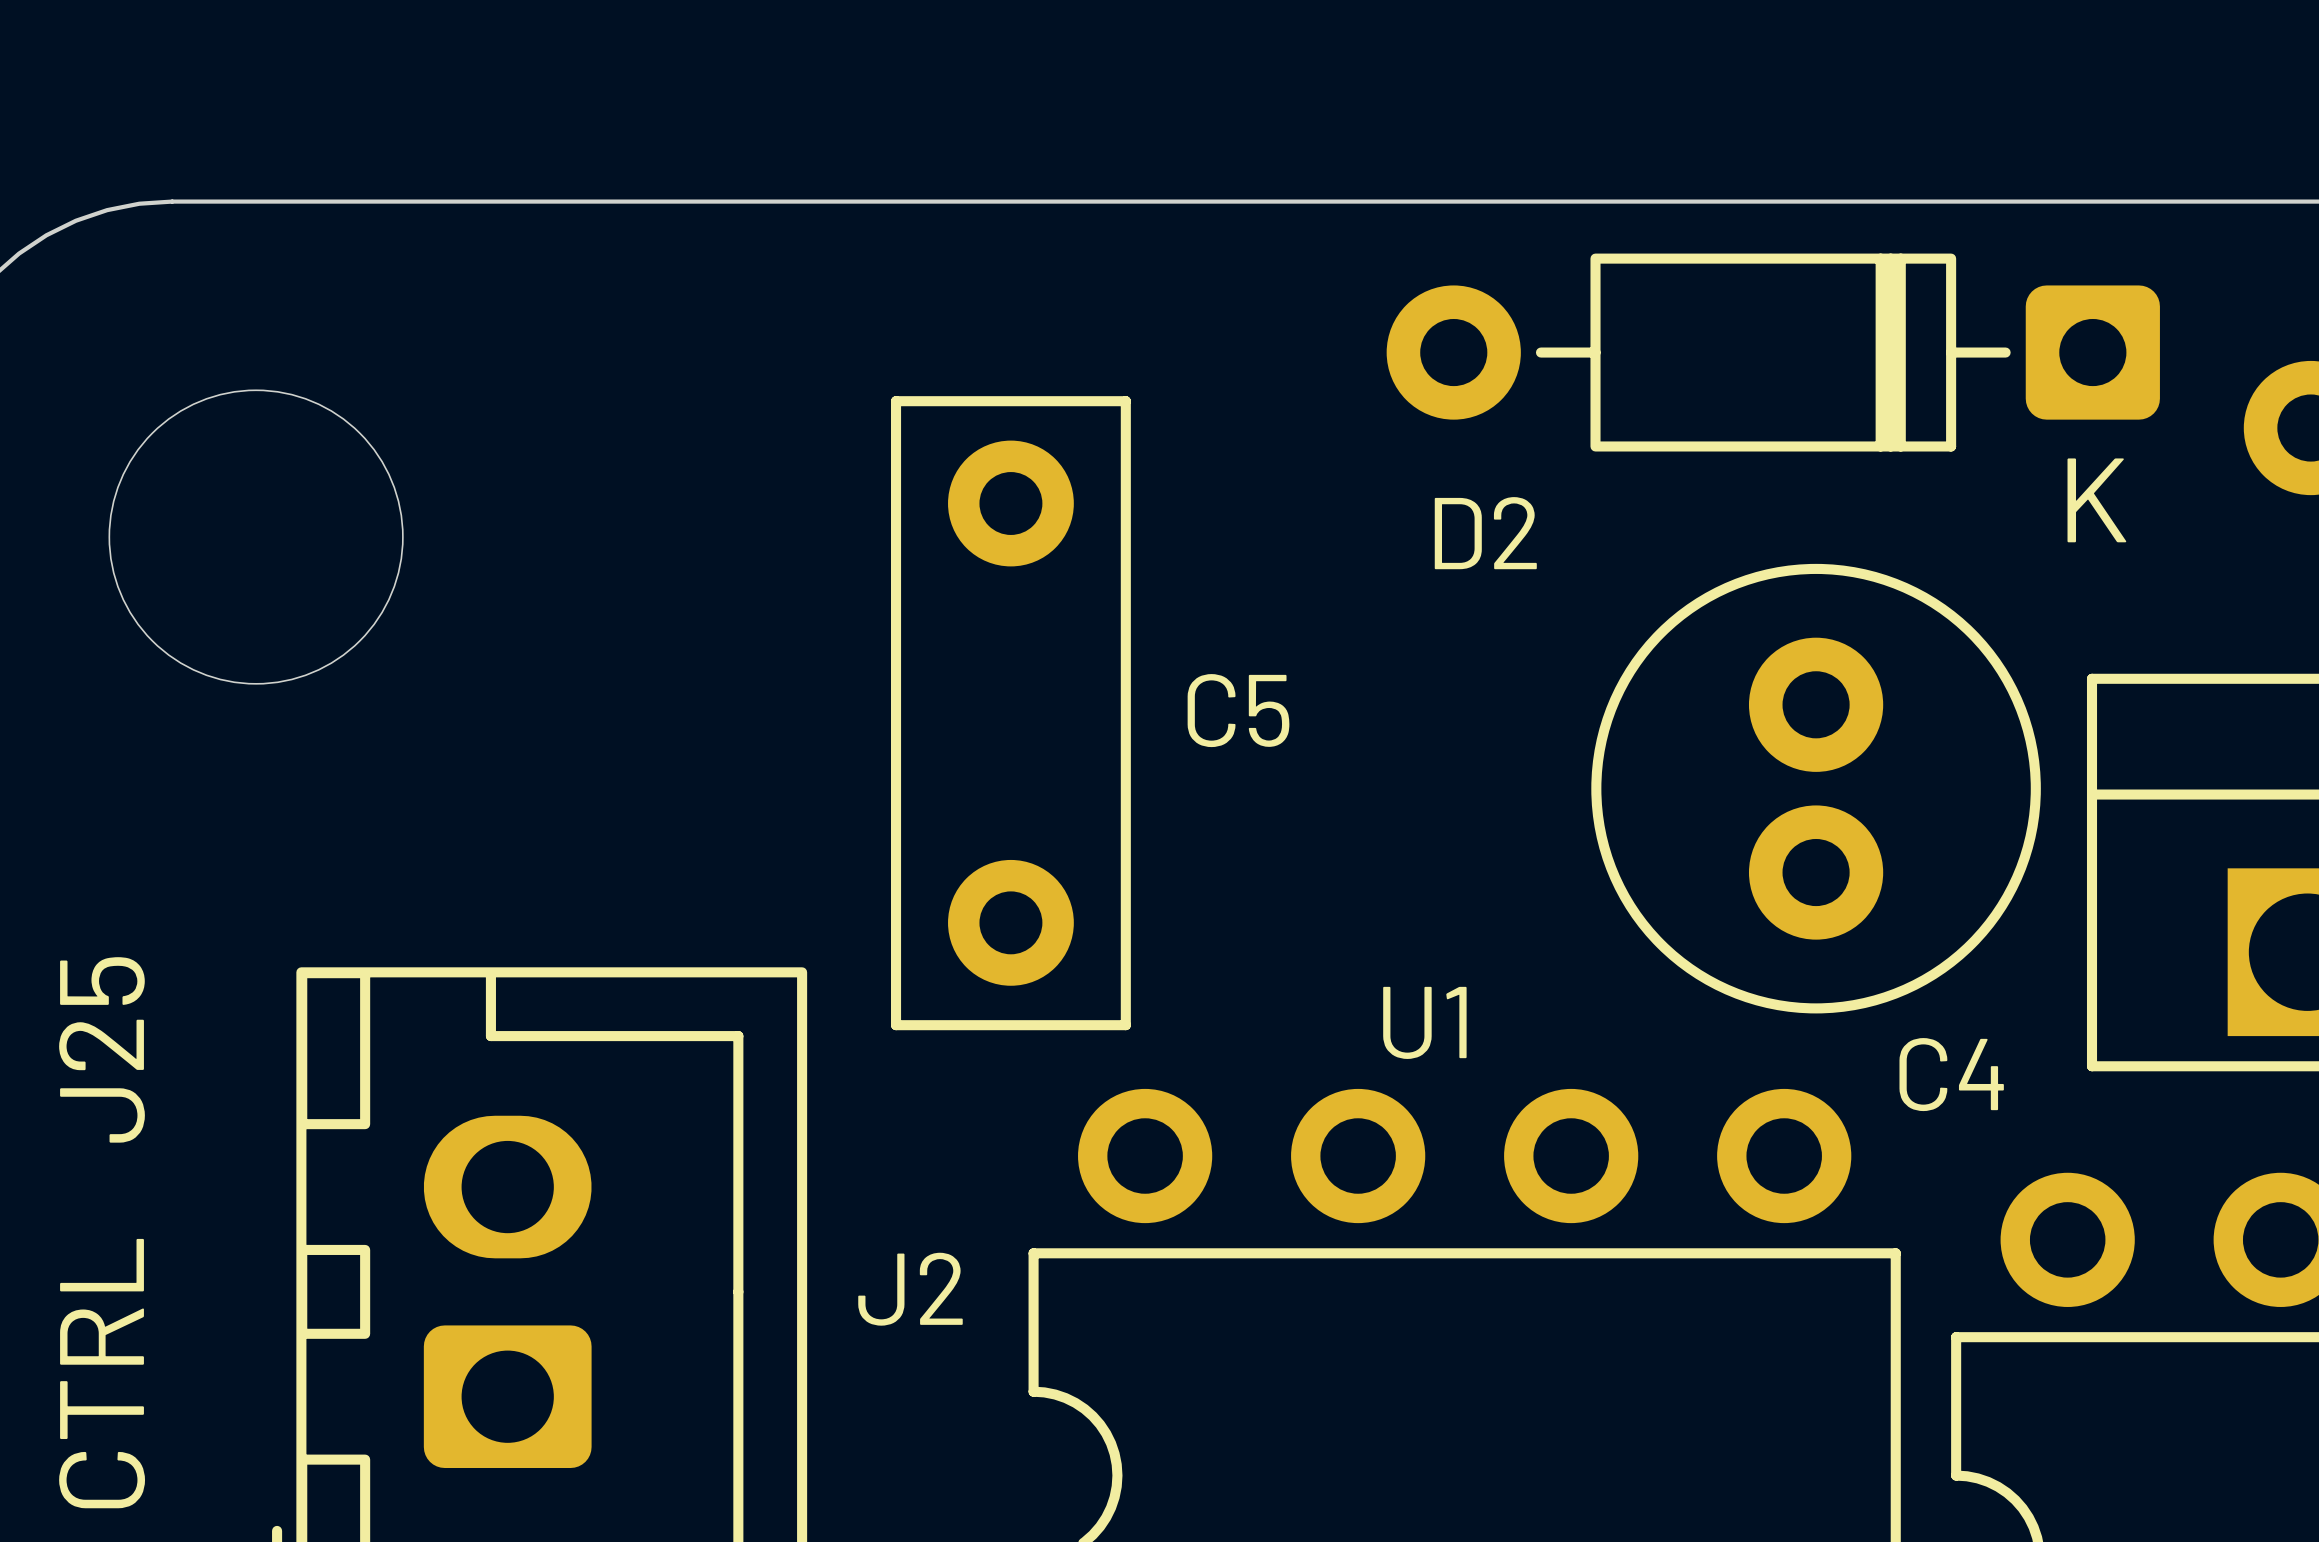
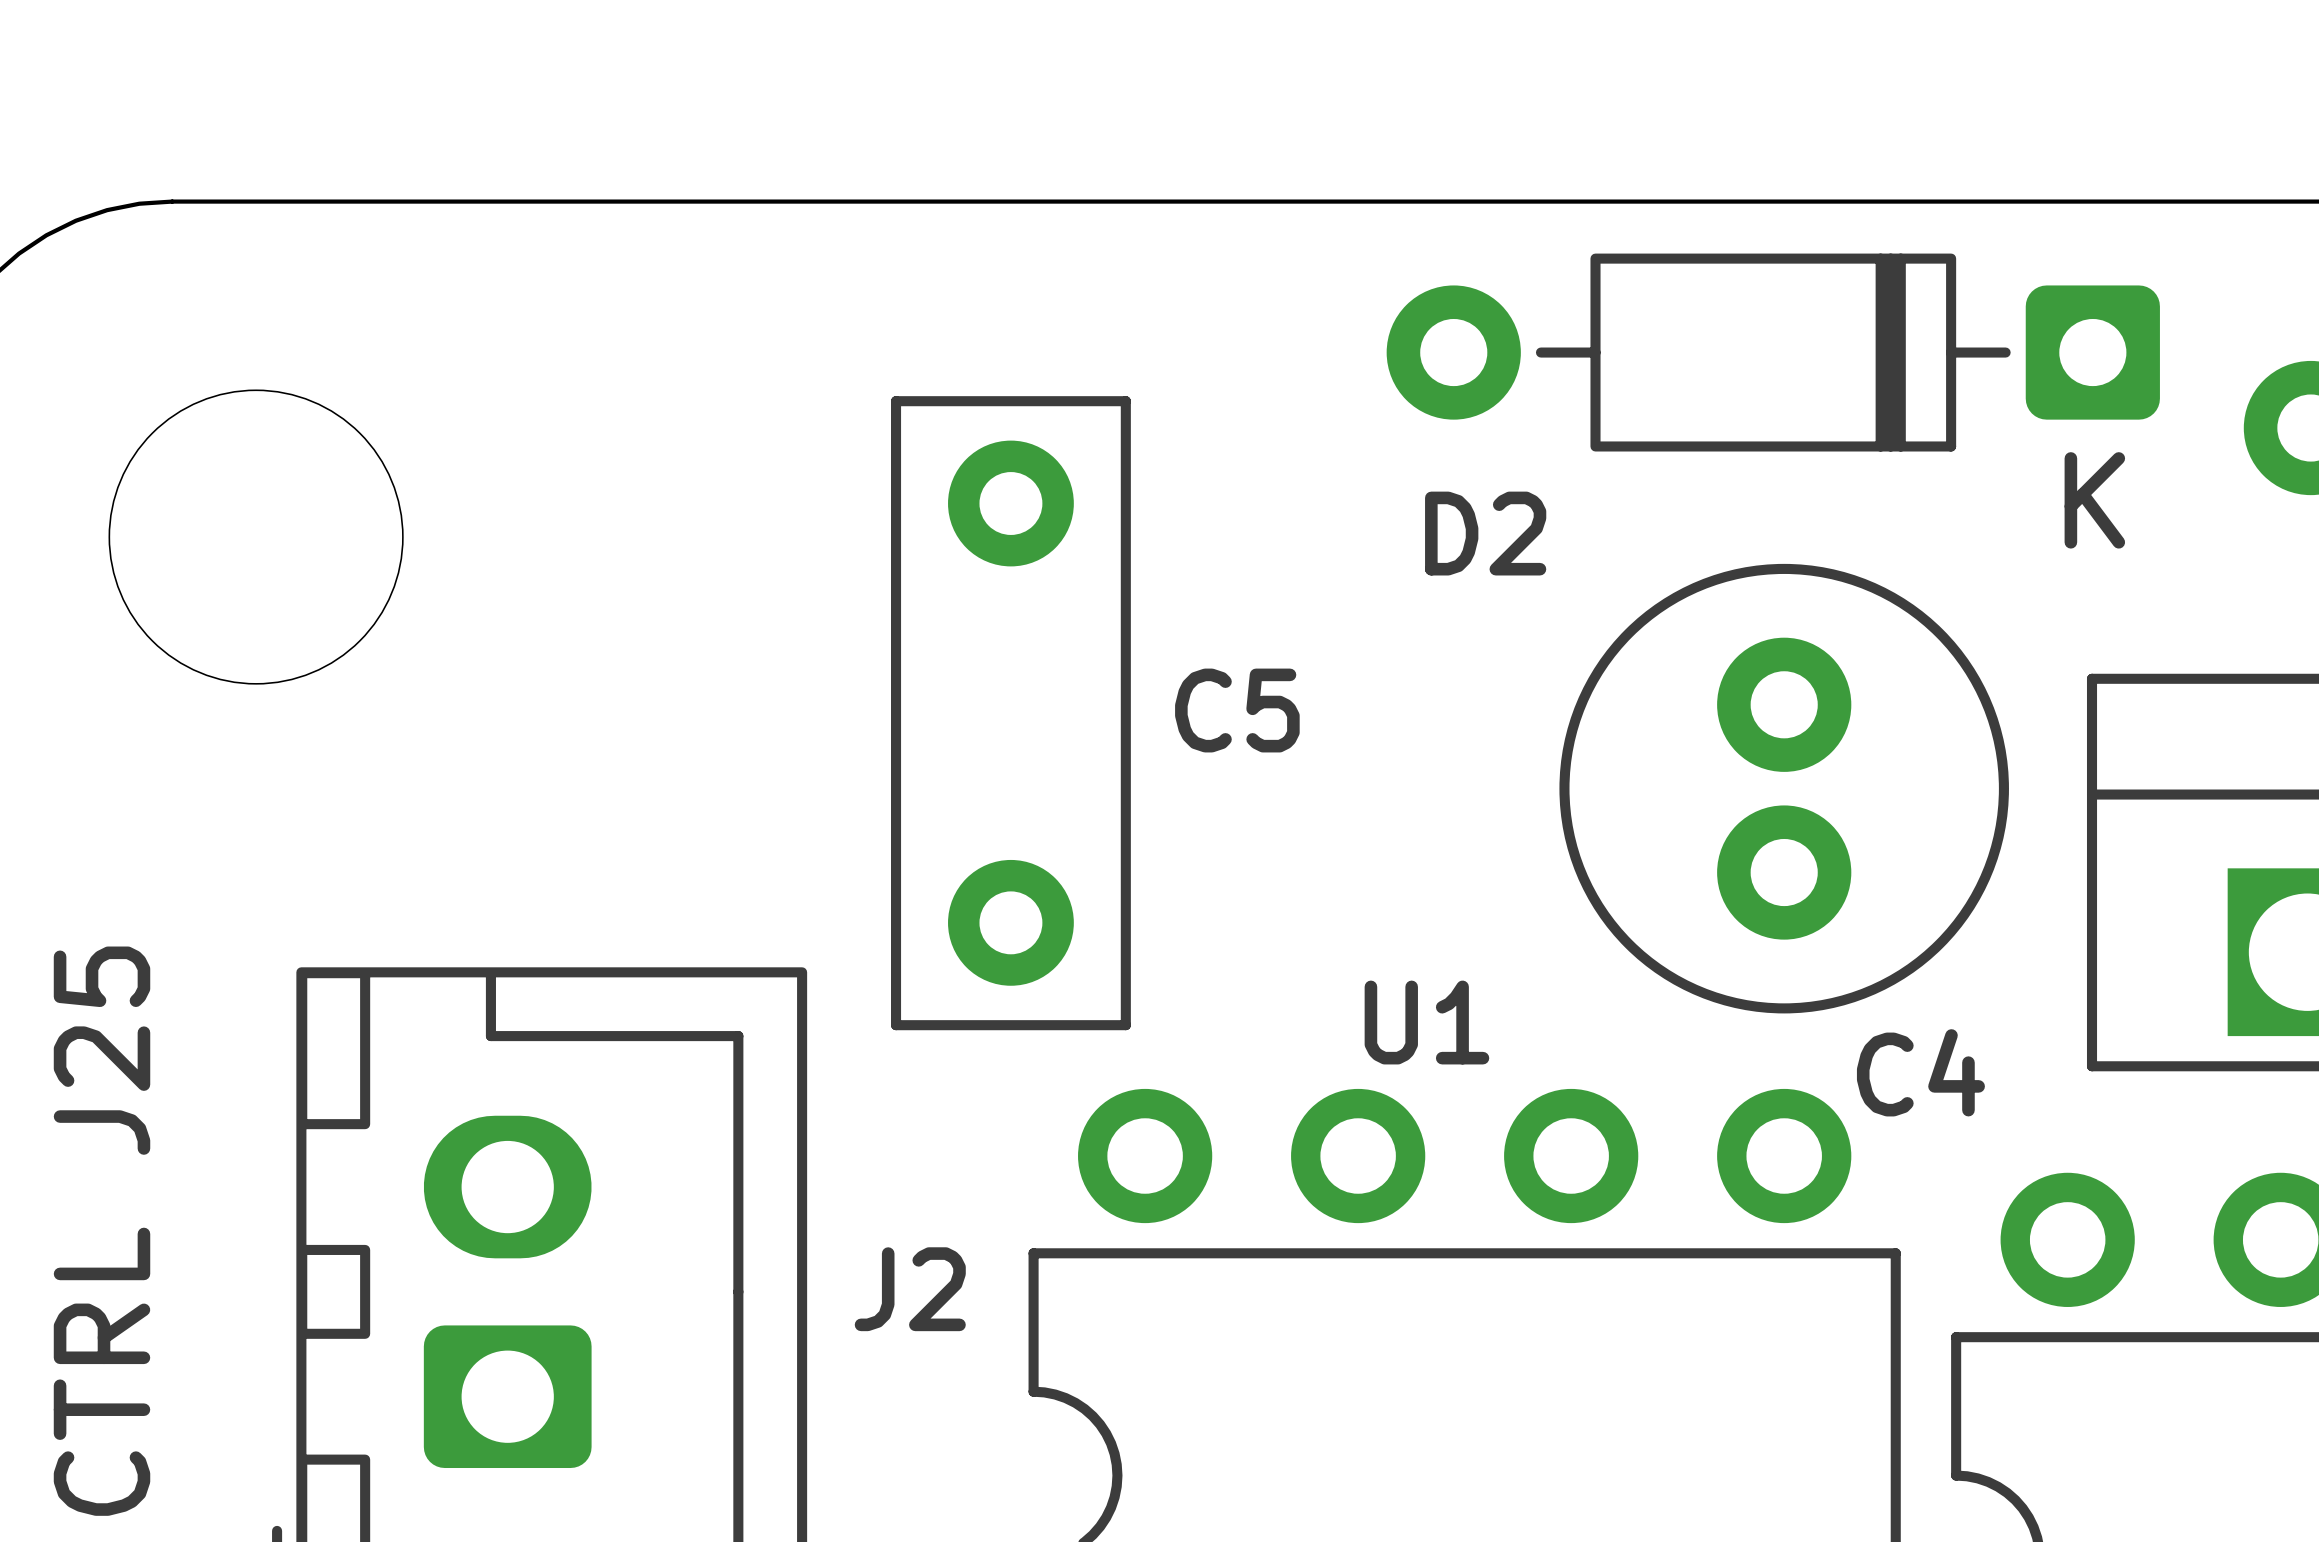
C4 position: (1816, 788) -> (1784, 788)

